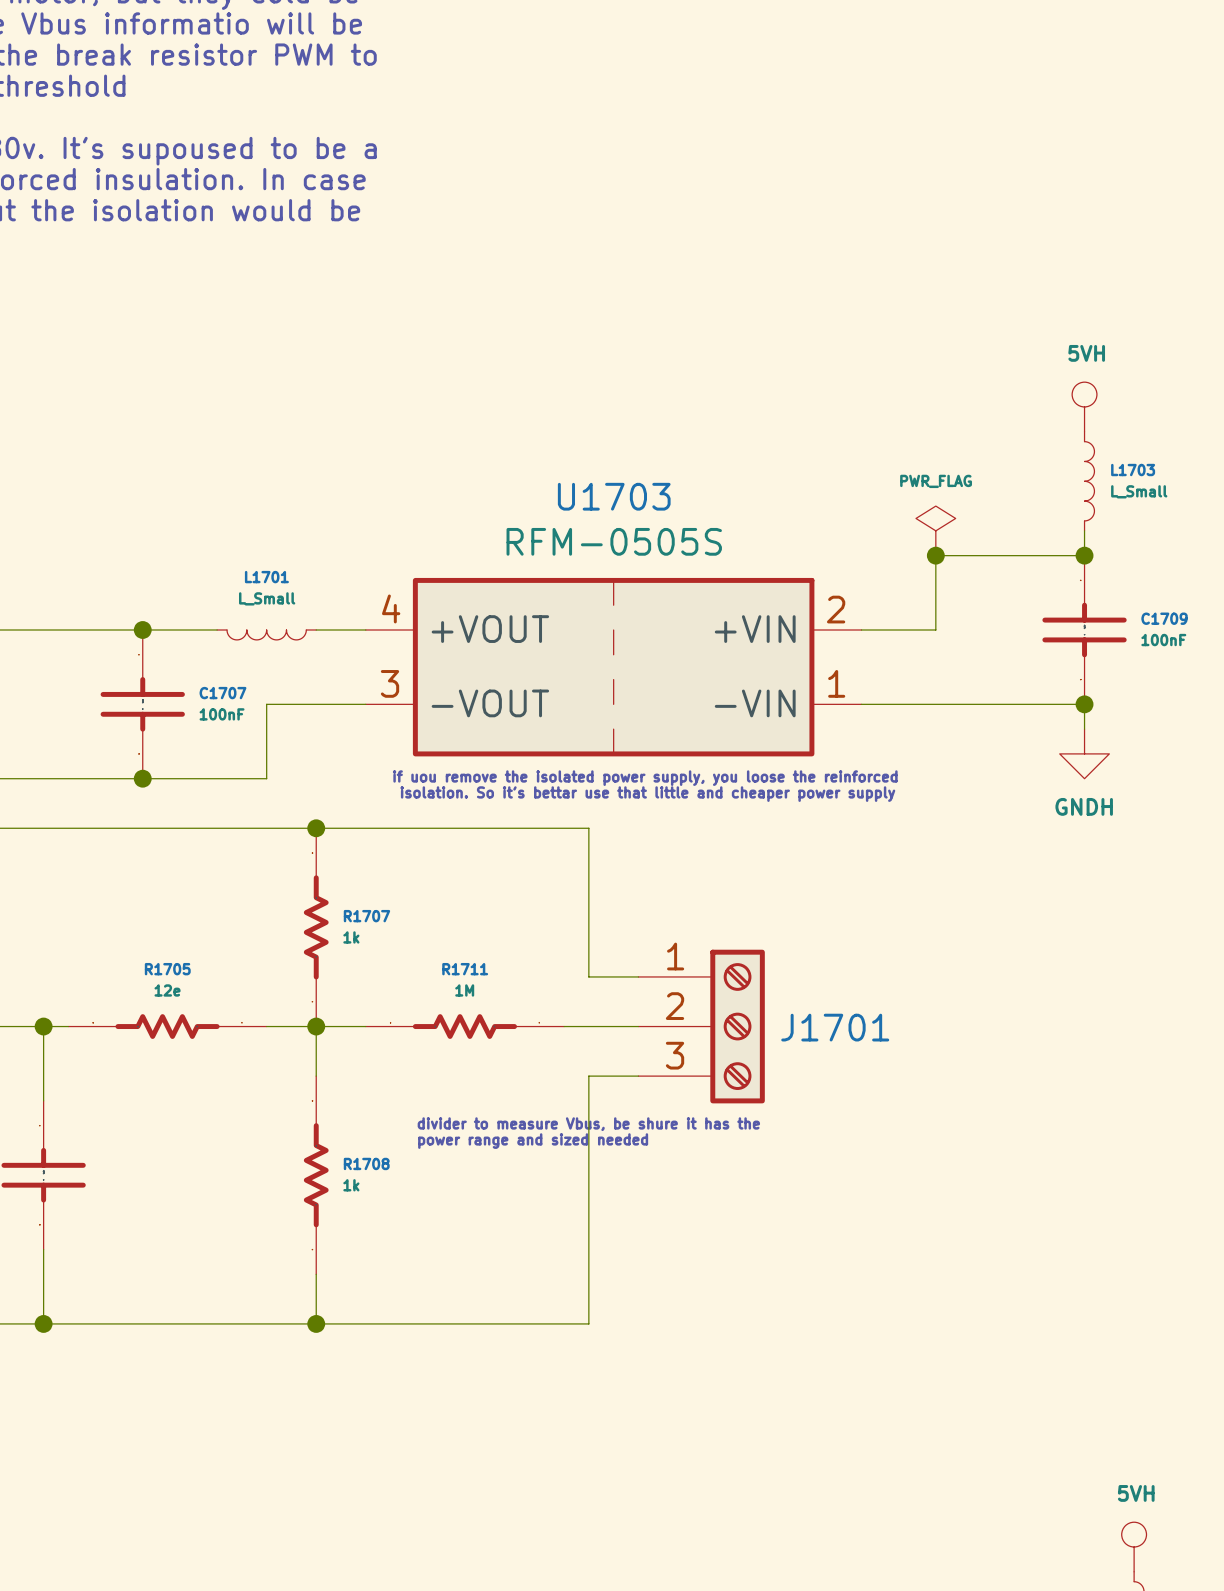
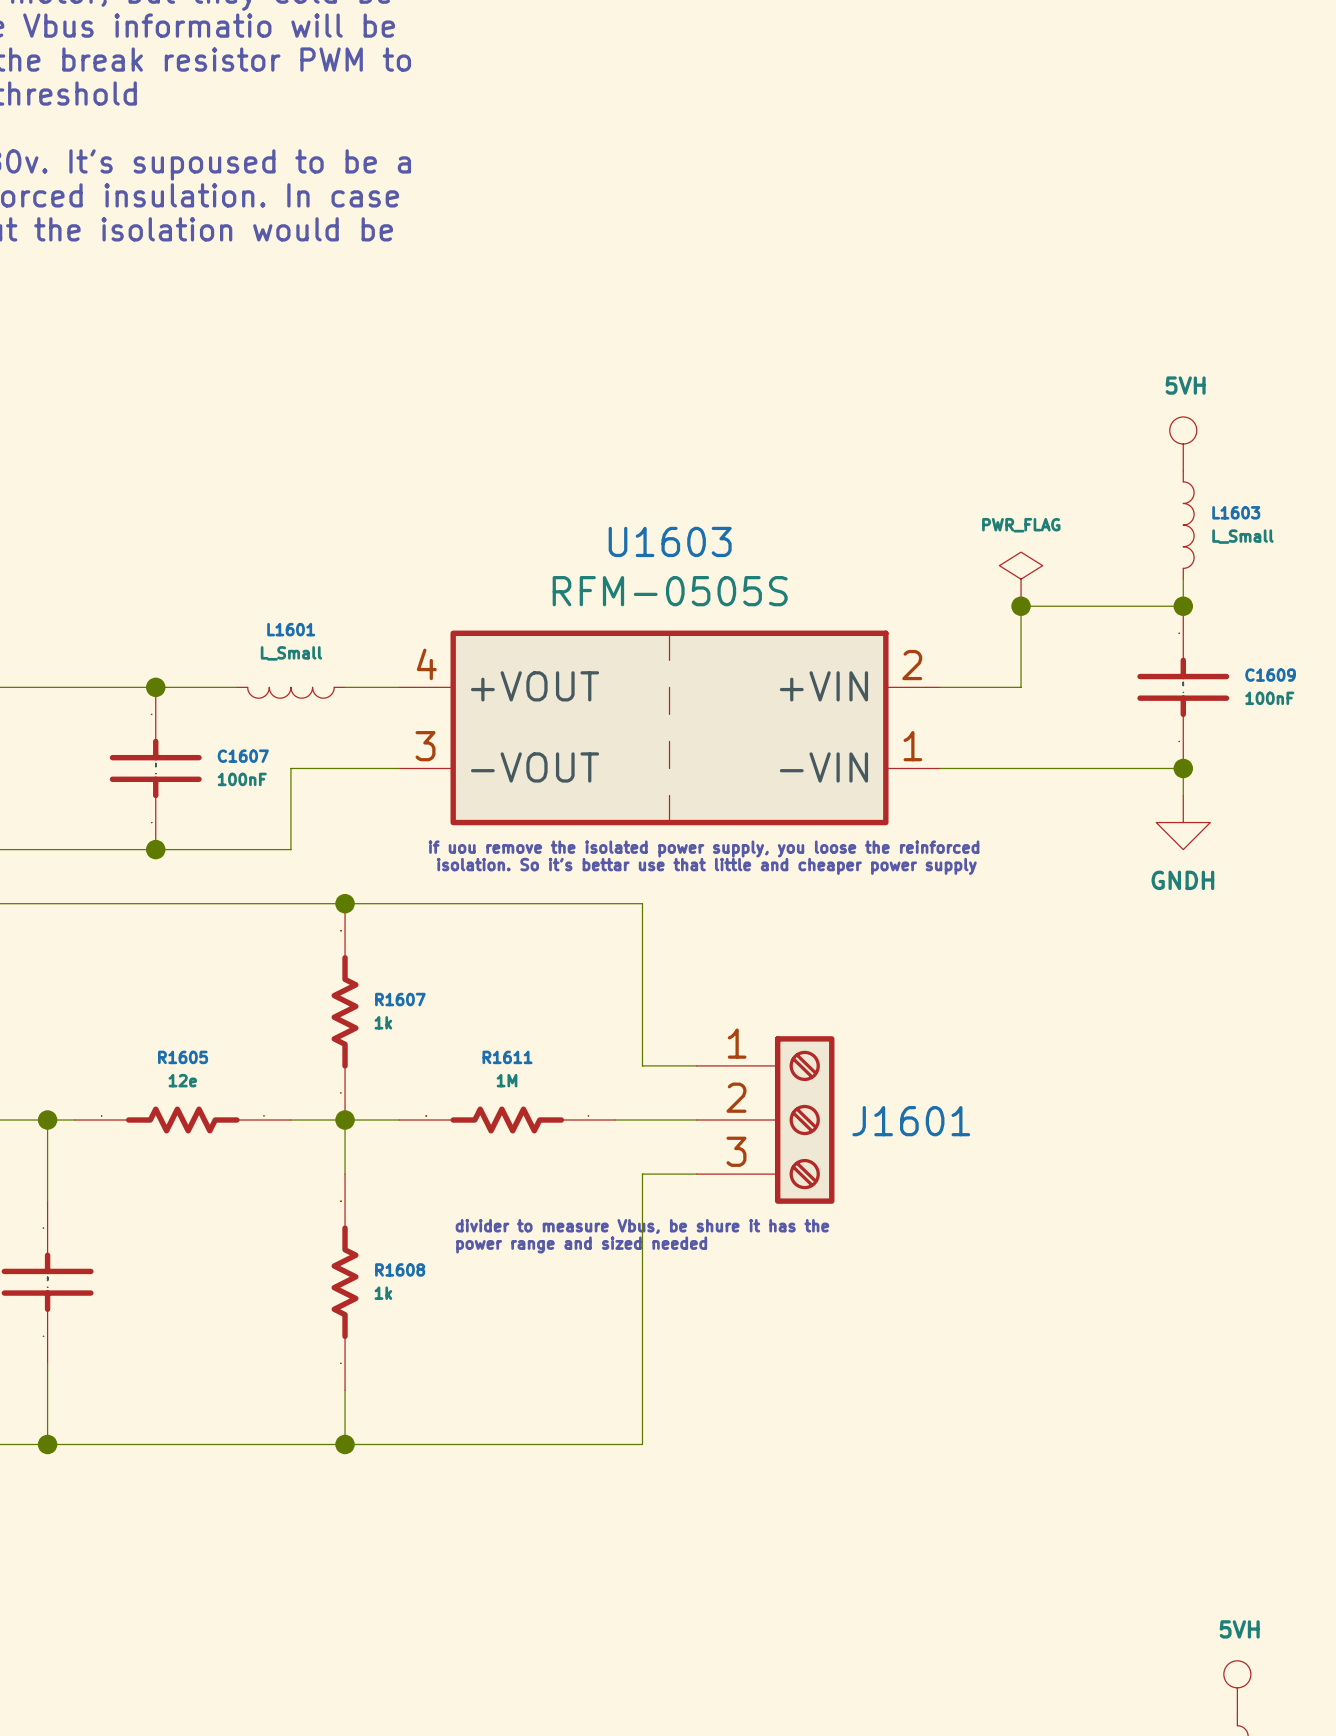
L1703 name: L1703 (1133, 470) -> L1603 (1236, 512)
U1703 name: U1703 (614, 496) -> U1603 (670, 541)
L1701 name: L1701 (266, 577) -> L1601 (291, 629)
C1709 name: C1709 (1164, 618) -> C1609 (1270, 675)
C1707 name: C1707 (222, 693) -> C1607 (243, 756)
R1707 name: R1707 (366, 916) -> R1607 (400, 999)
R1705 name: R1705 (167, 969) -> R1605 (183, 1057)
R1711 name: R1711 (465, 969) -> R1611 (507, 1057)
J1701 name: J1701 (835, 1027) -> J1601 (911, 1121)
R1708 name: R1708 (366, 1163) -> R1608 (400, 1269)

